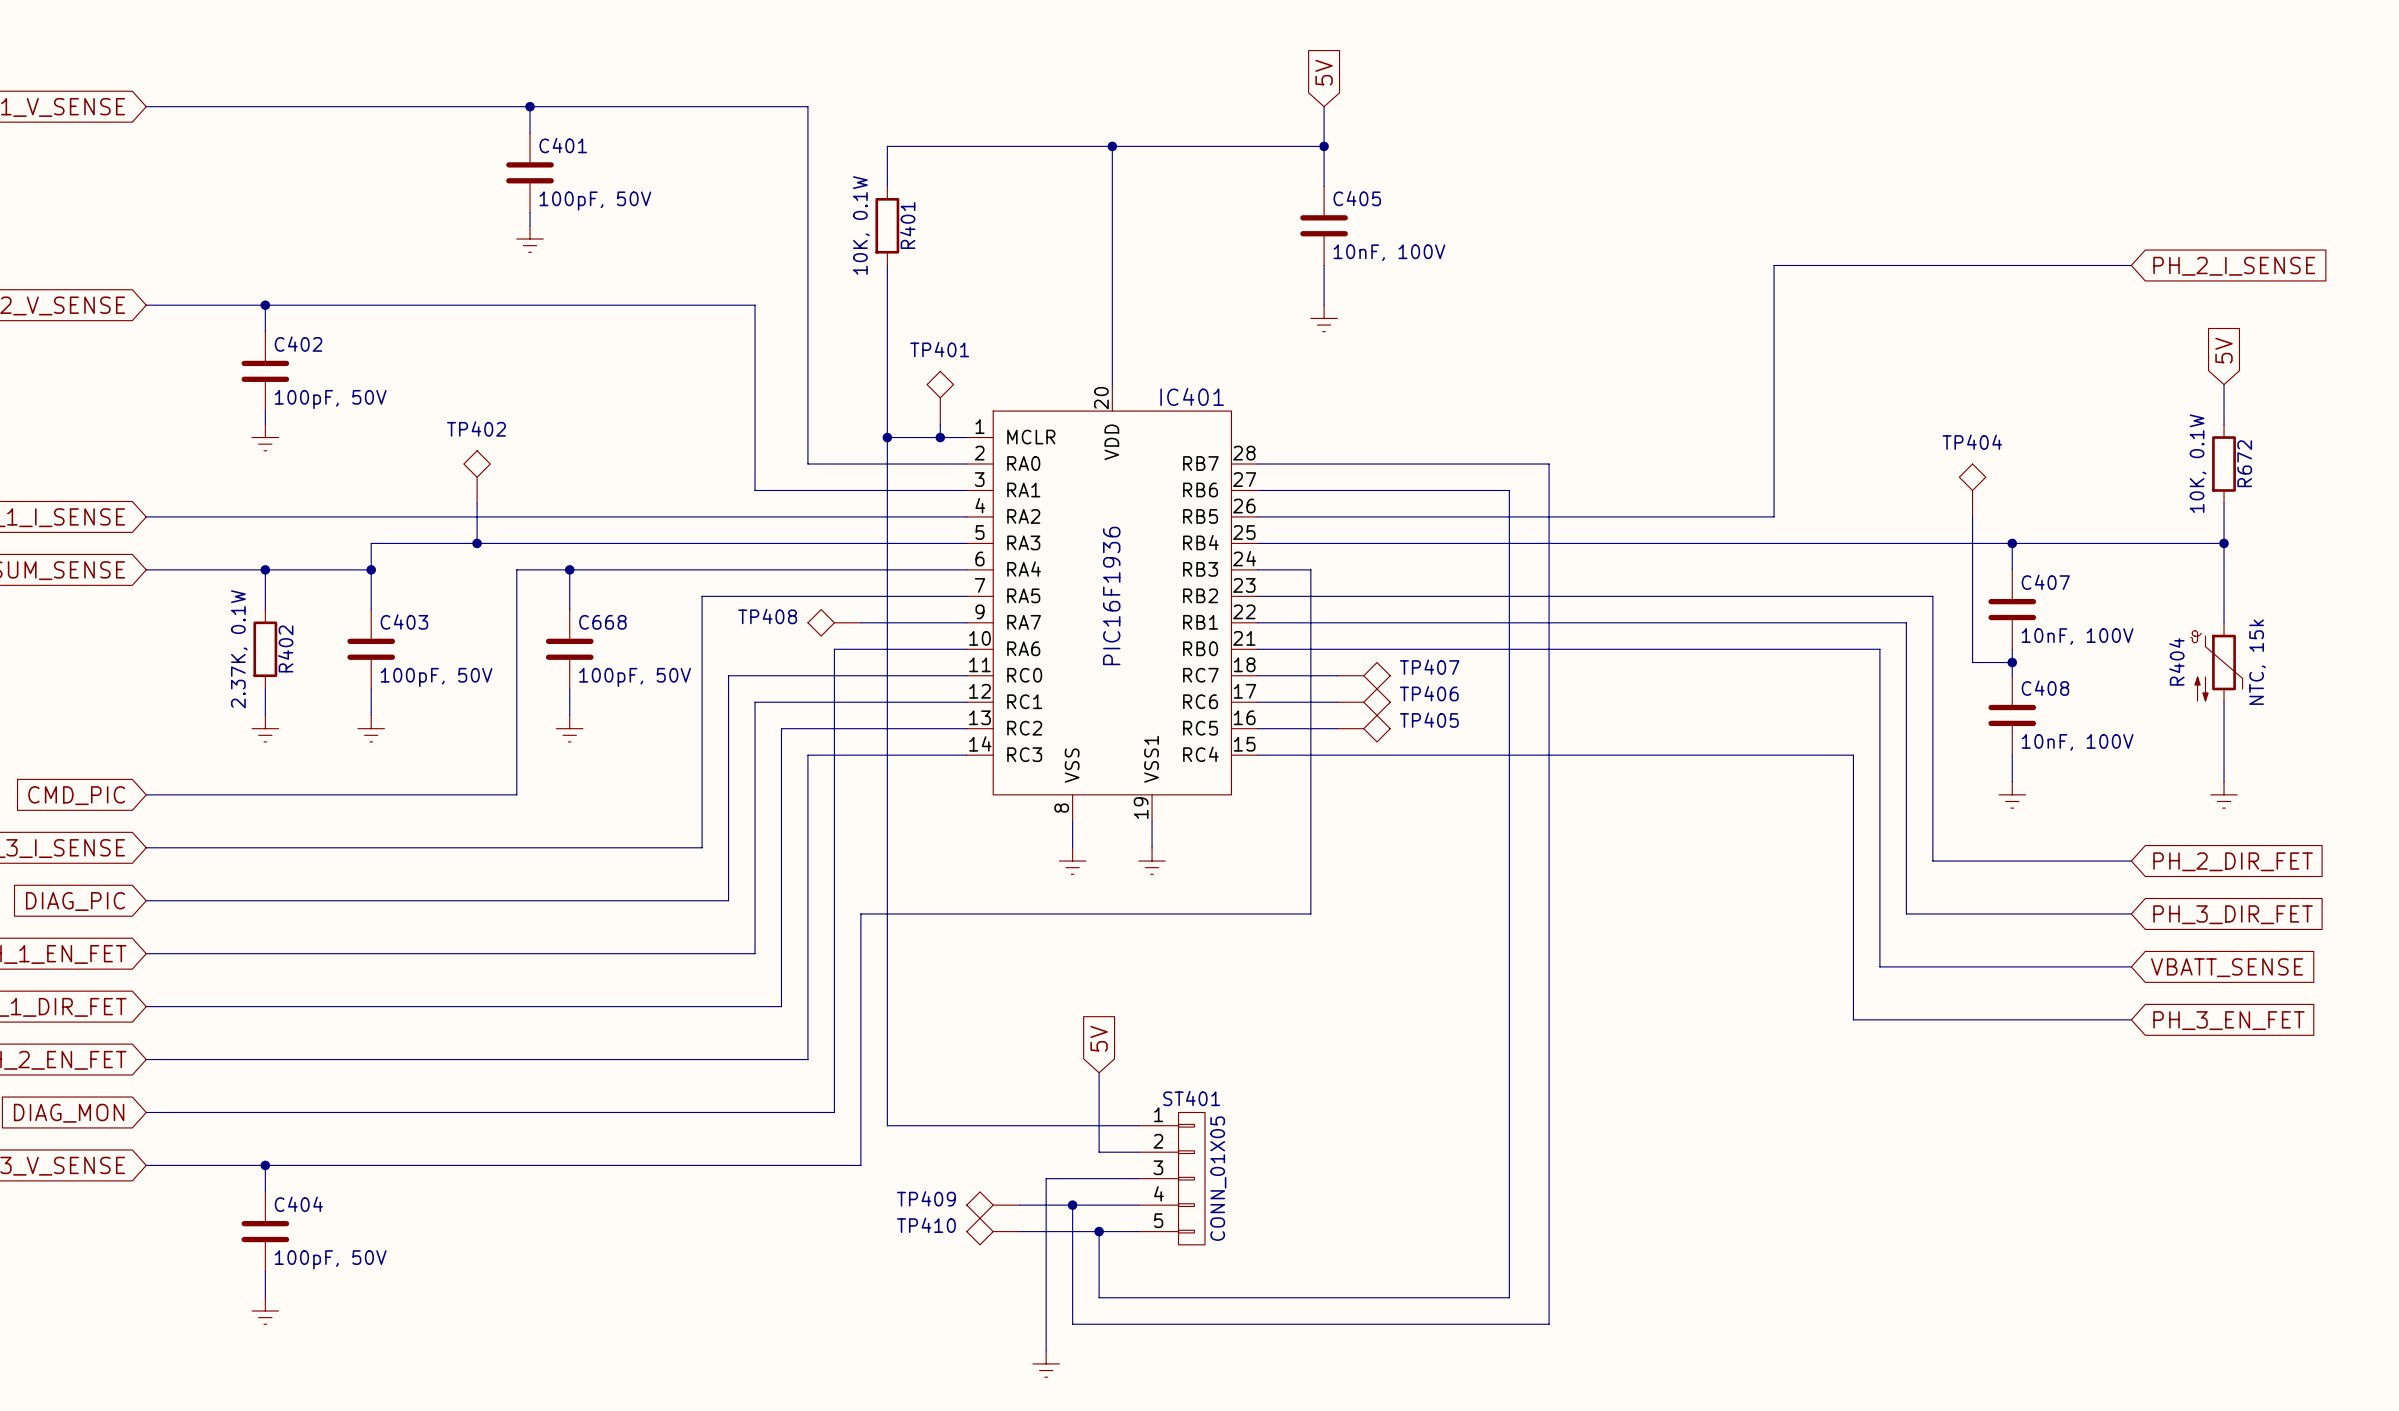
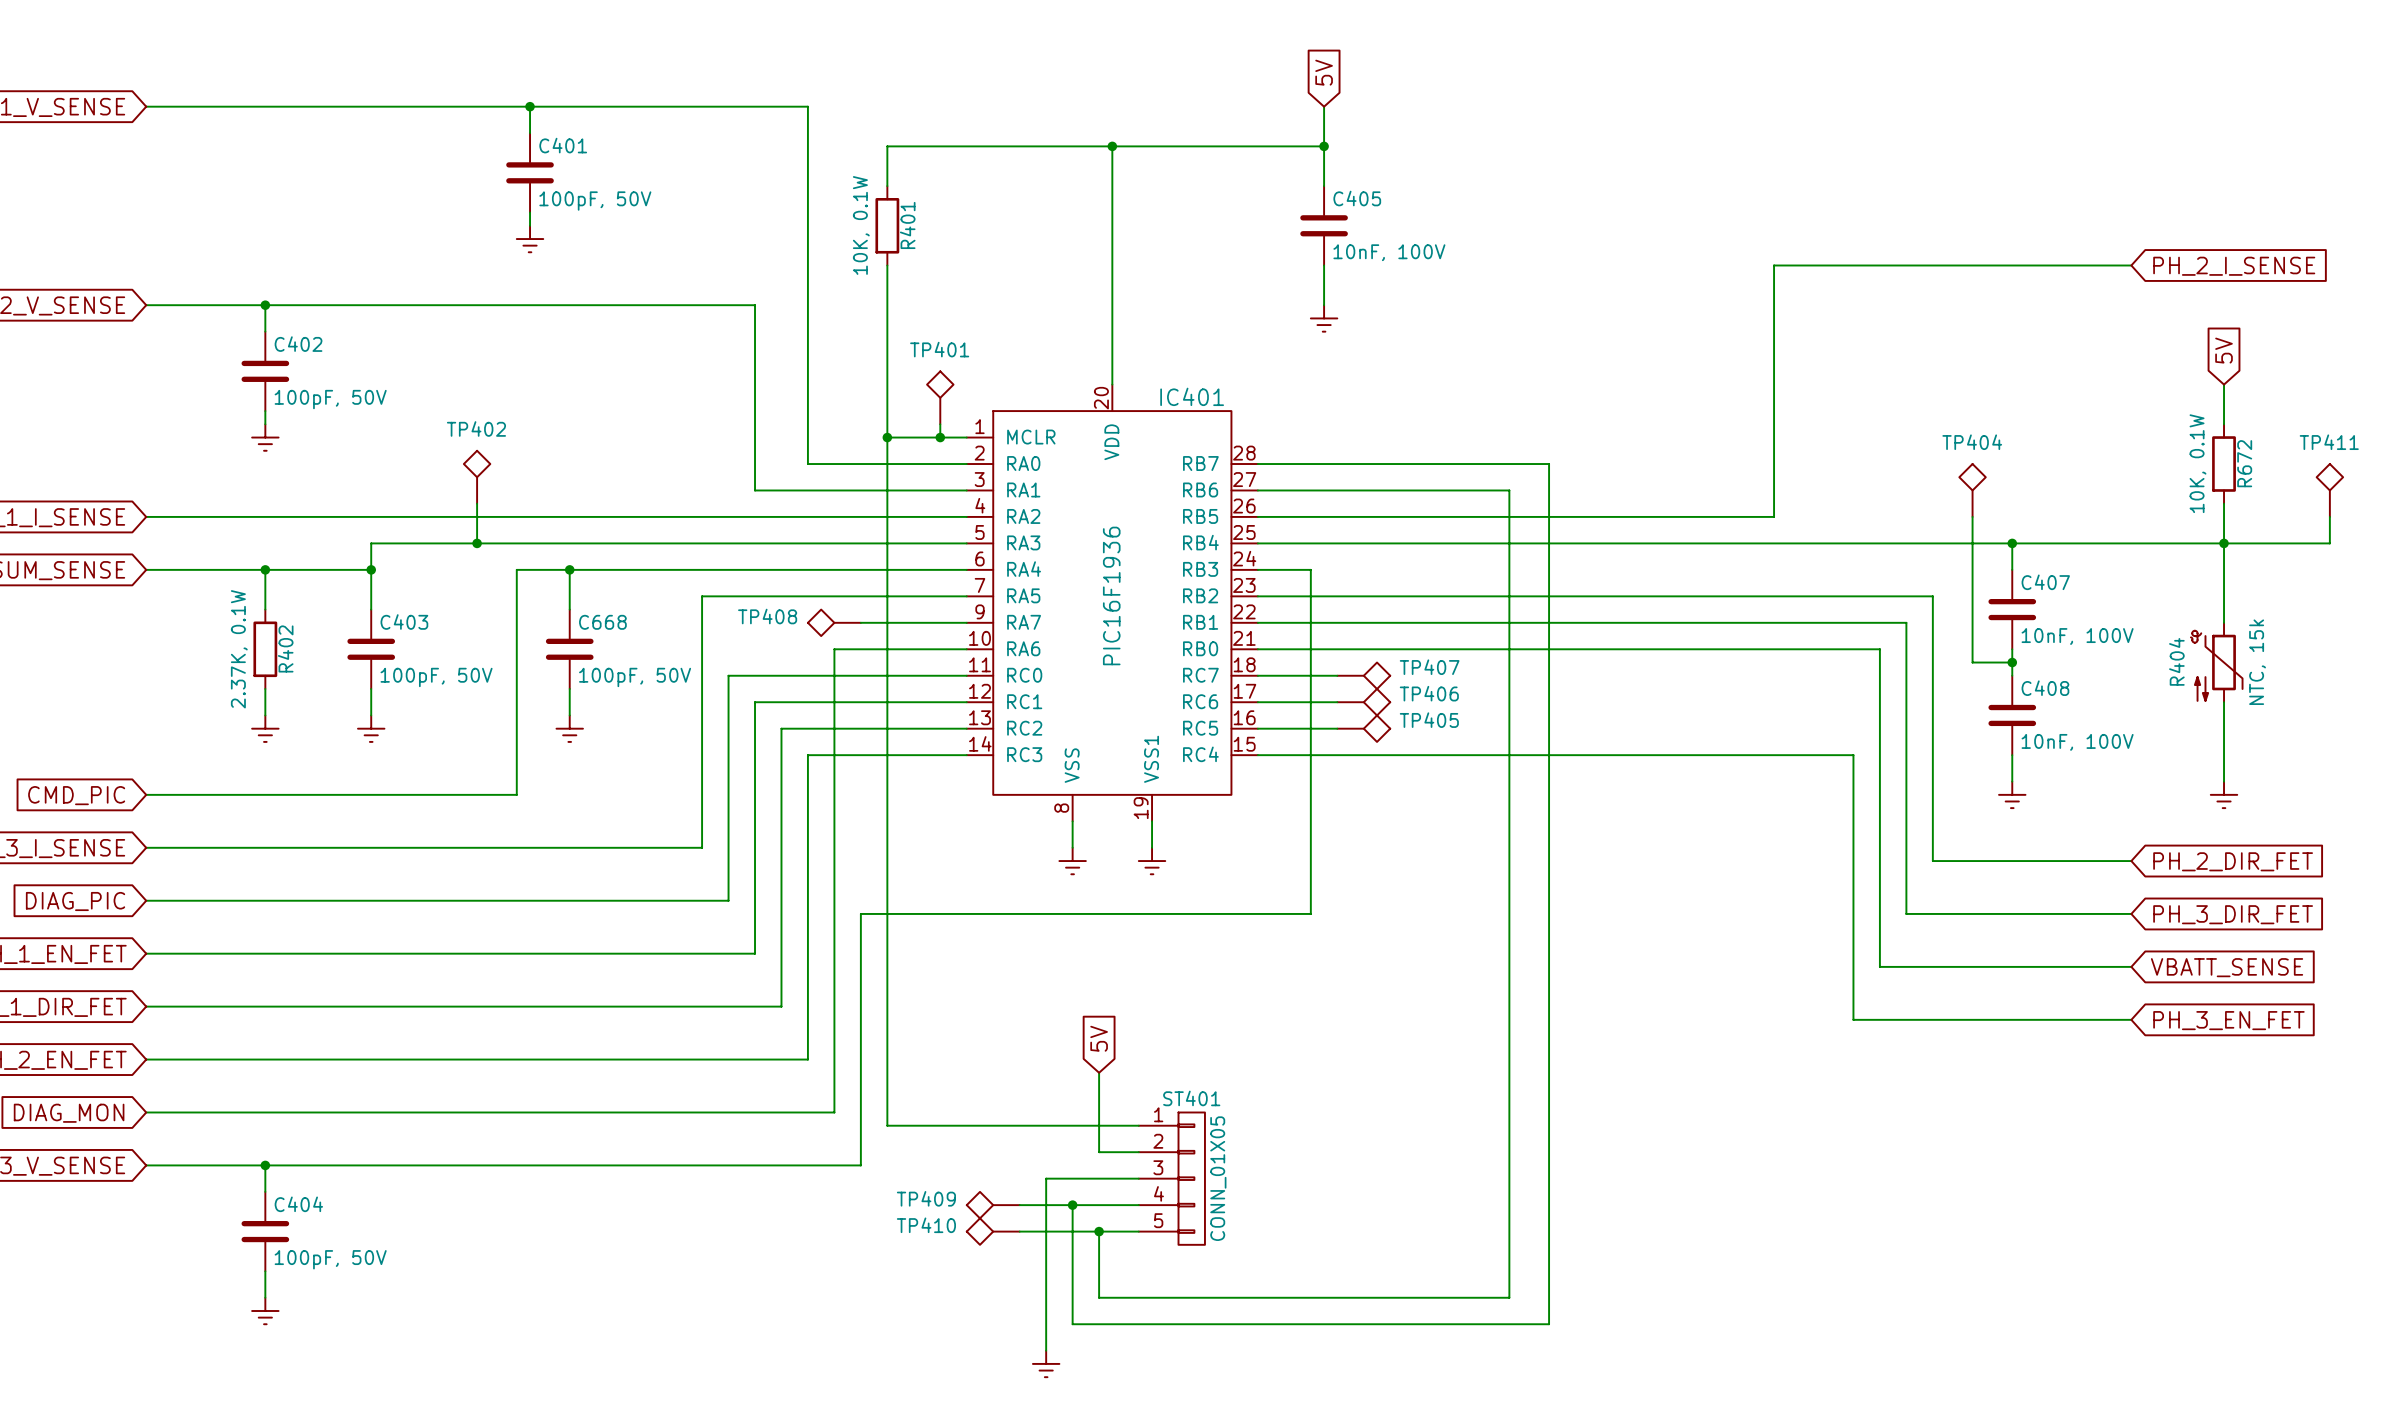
TP411: none -> (2329, 490)
wire: none -> (2329, 516) (2329, 543) (2224, 543)

